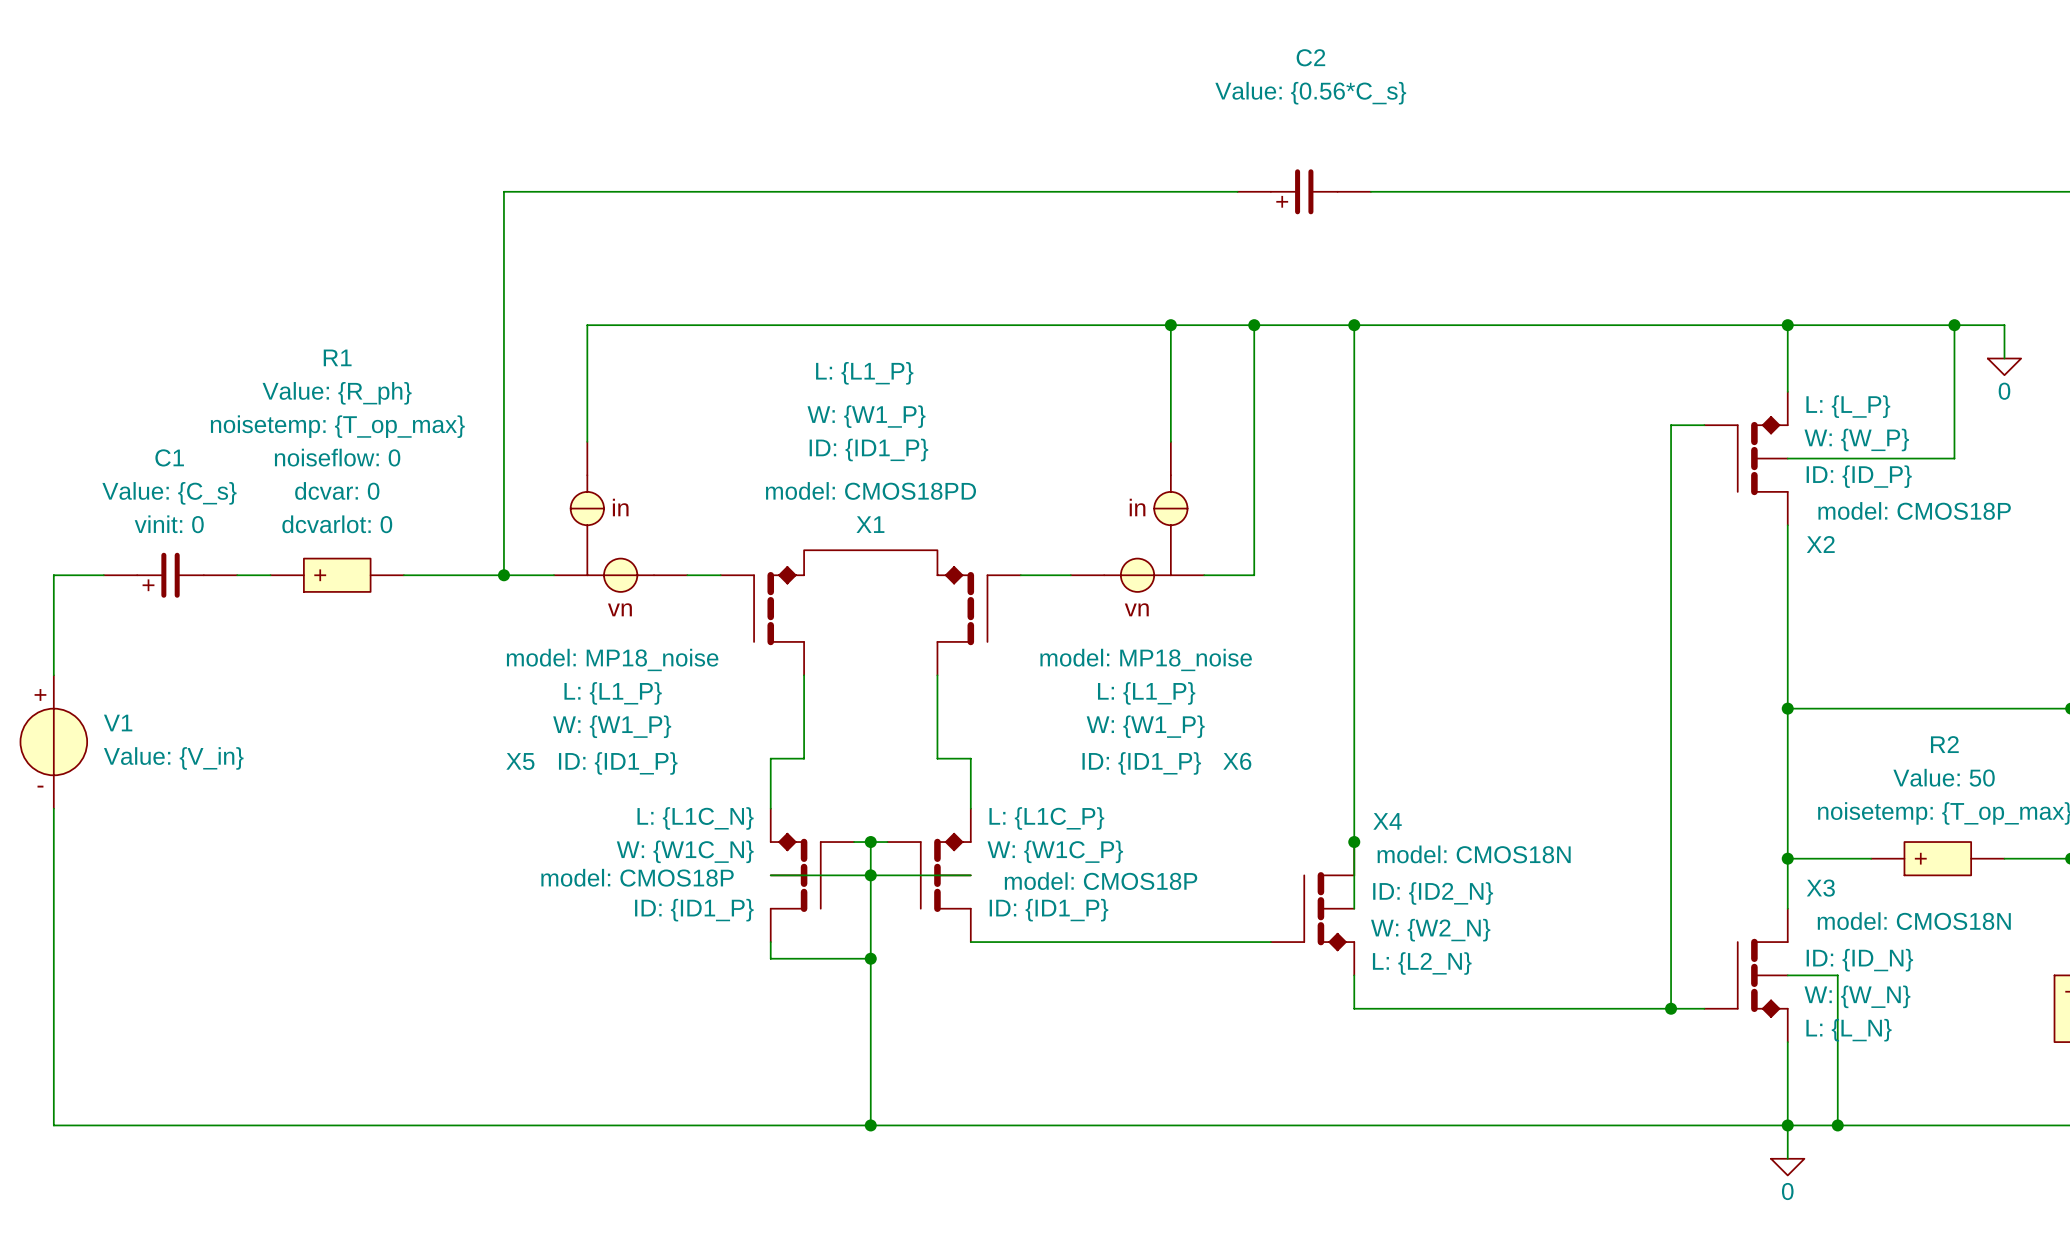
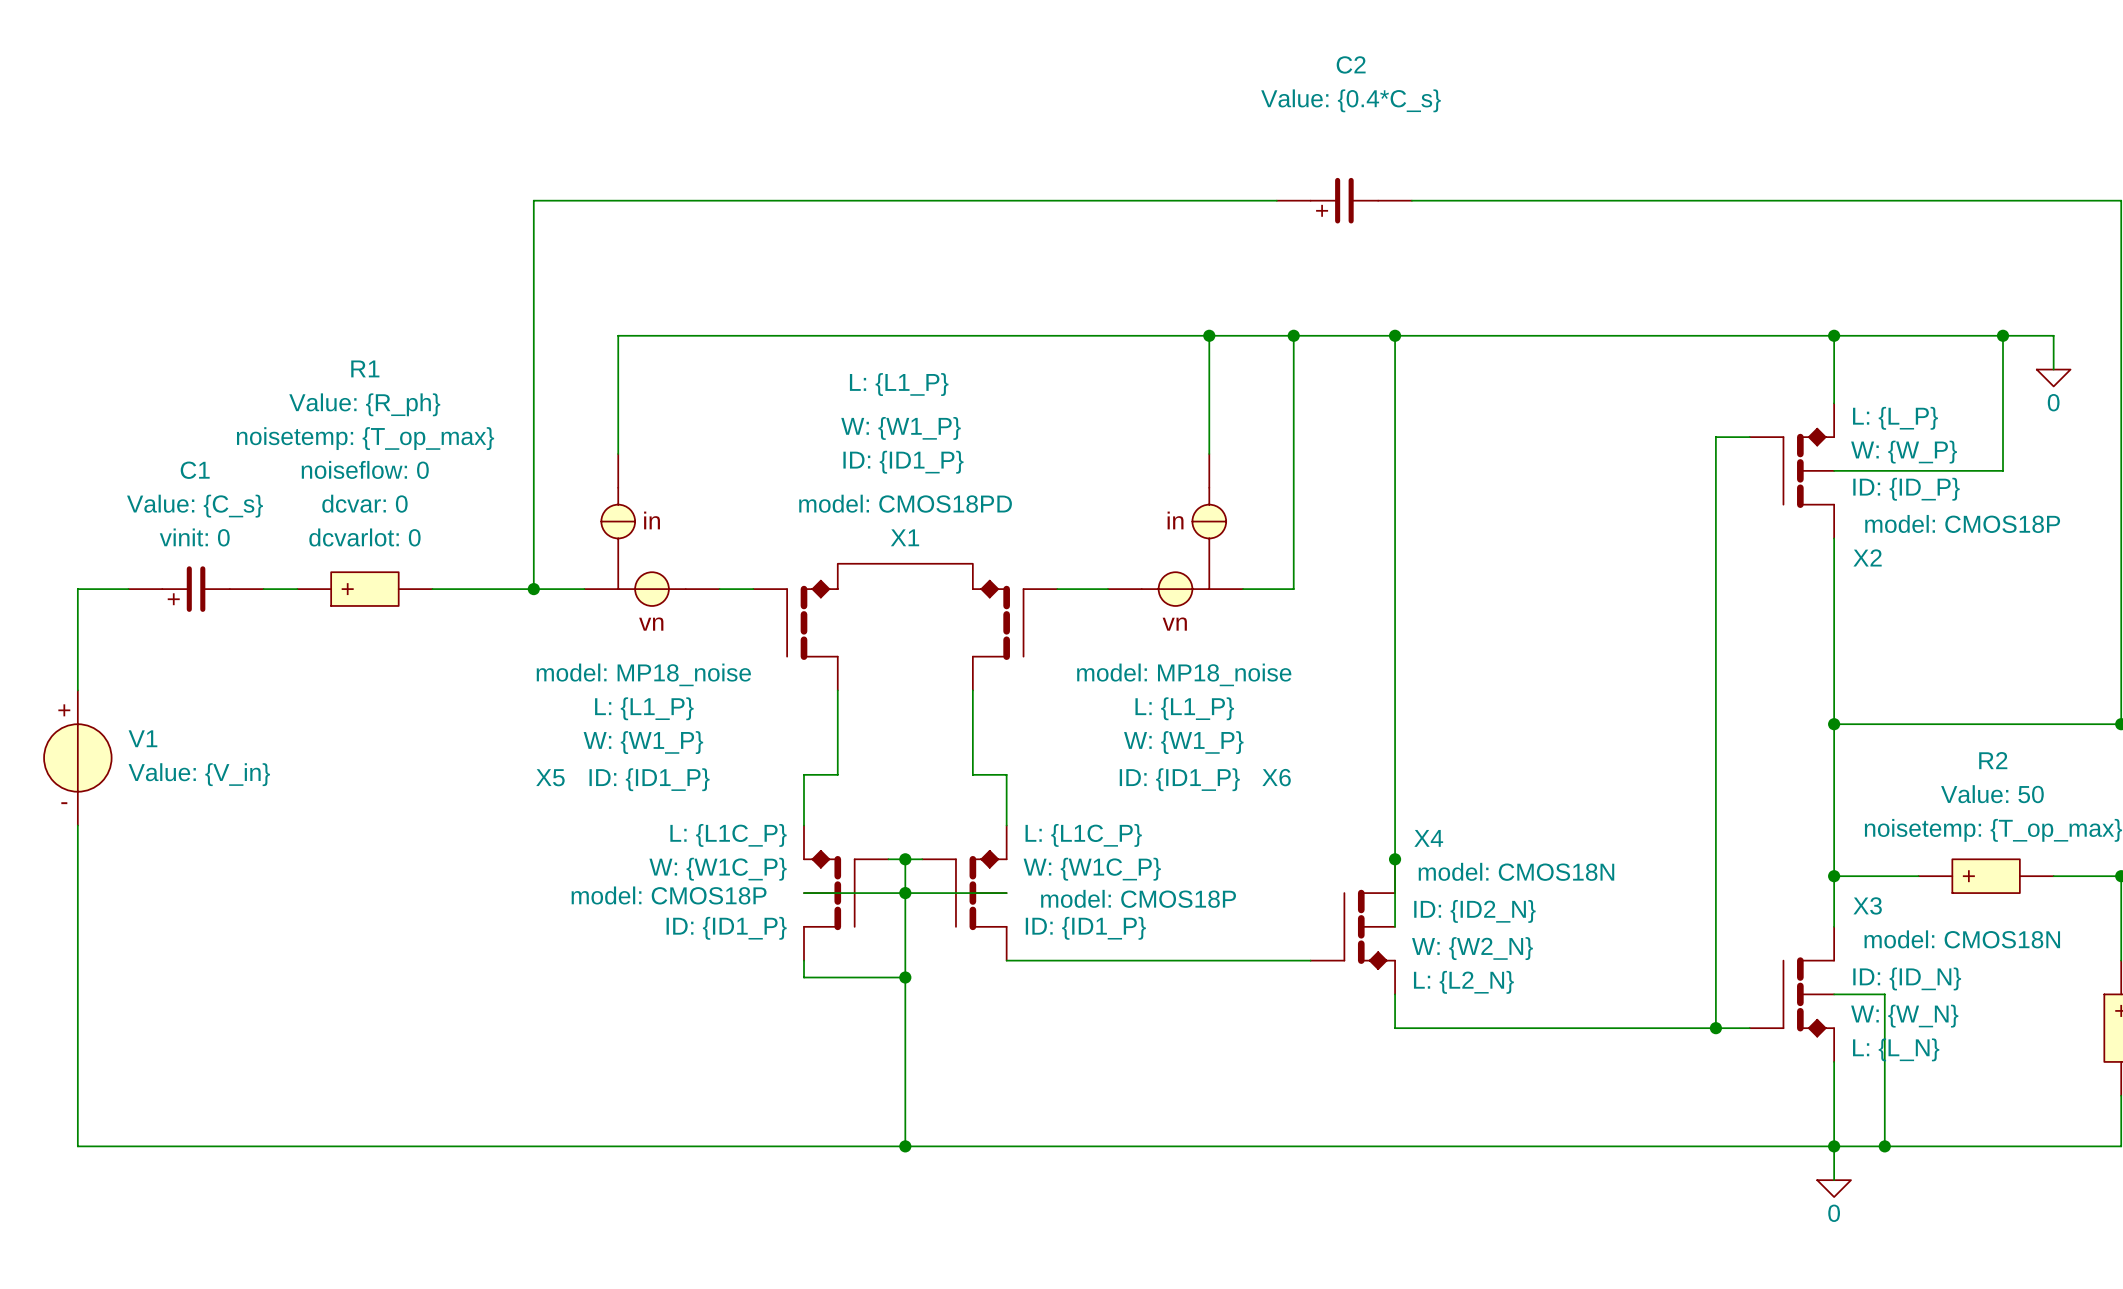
C2 value: Value: {0.56*C_s} (1310, 93) -> Value: {0.4*C_s} (1350, 100)
part text: L: {L1C_N} (695, 818) -> L: {L1C_P} (728, 835)
part text: W: {W1C_N} (685, 851) -> W: {W1C_P} (718, 869)

